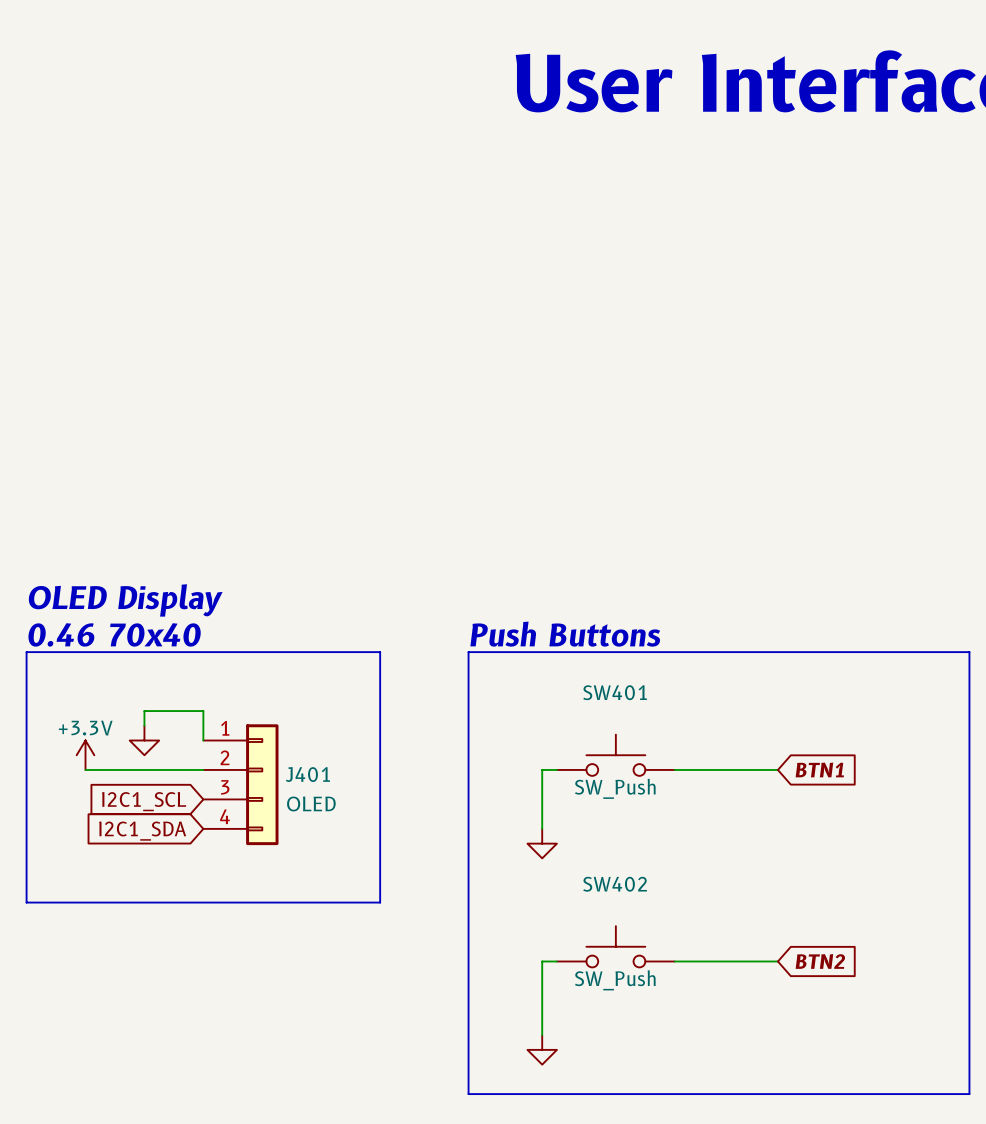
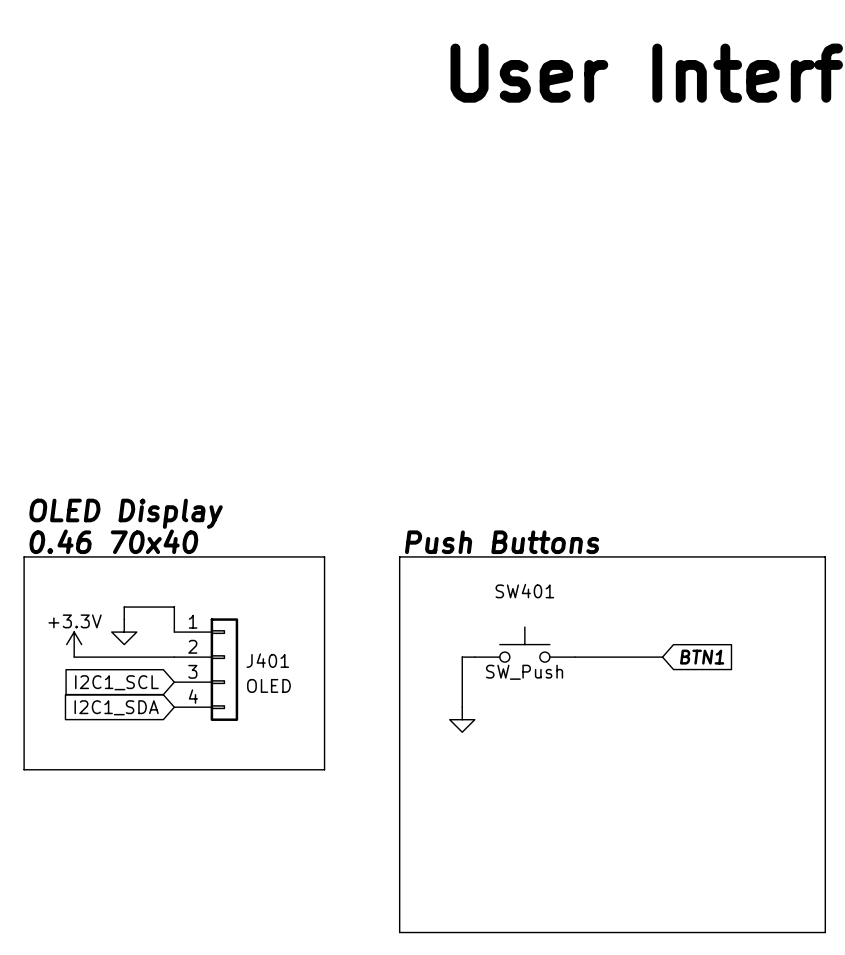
SW402: SW_Push (615, 946) -> none
wire: (556, 961) (542, 961) (542, 1035) -> none
wire: (674, 961) (777, 961) -> none
global label: BTN2 (820, 961) -> none
power symbol: (542, 1049) -> none

